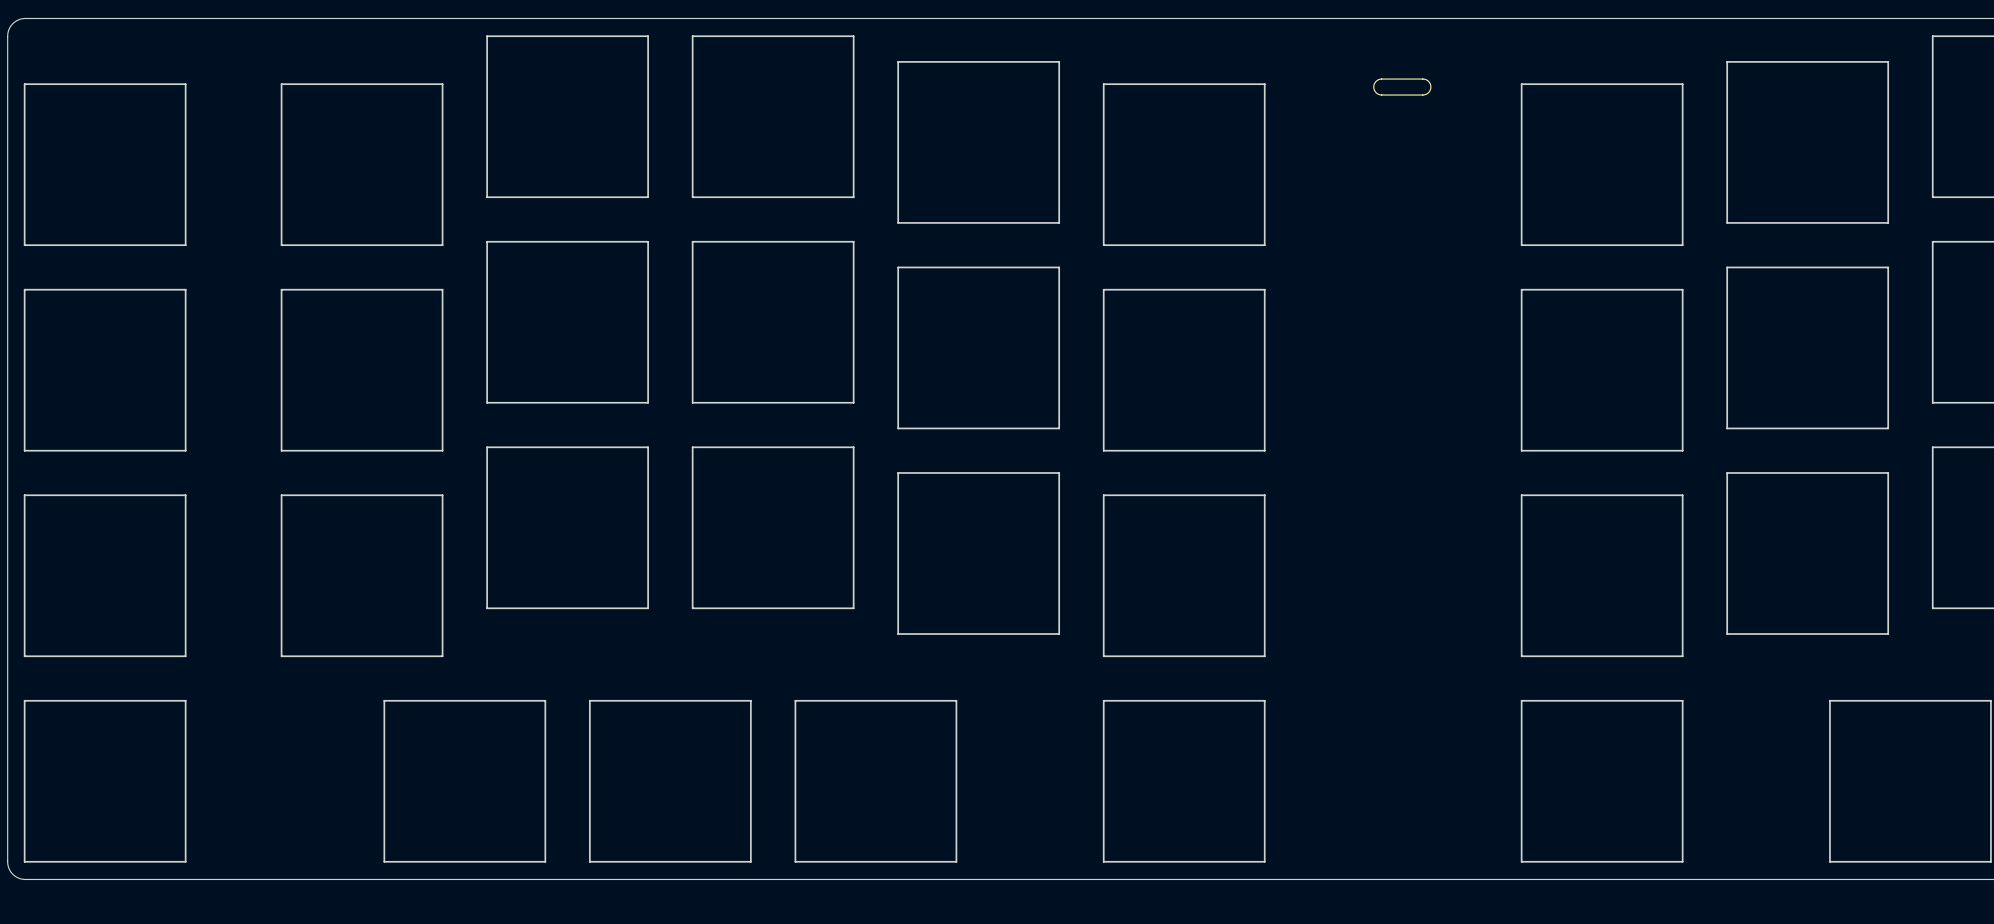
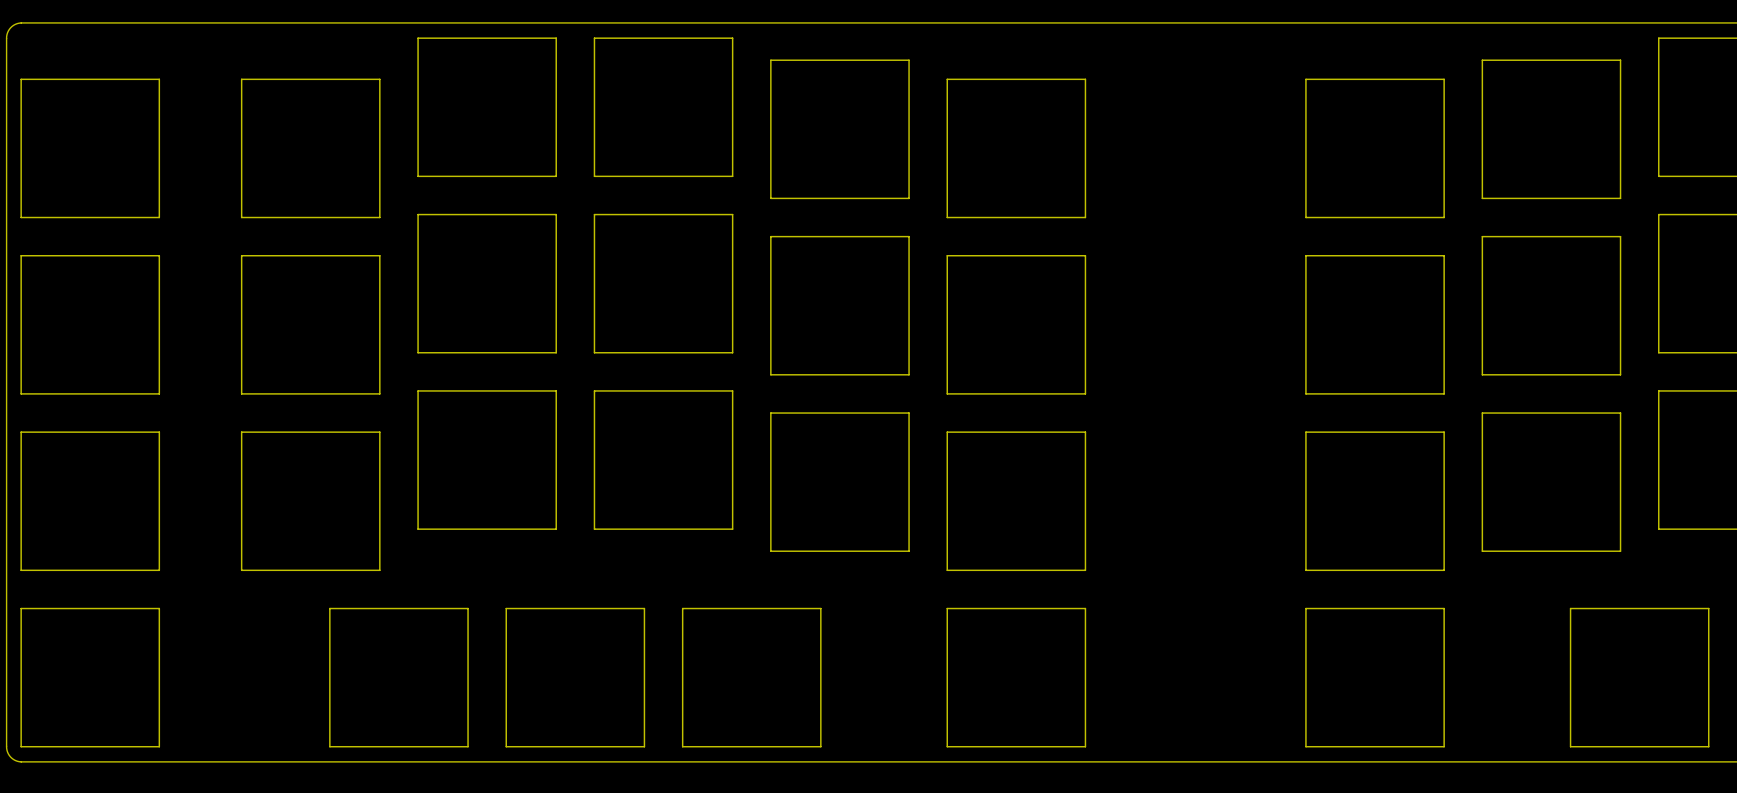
drawing: [1373, 78, 1432, 96] -> none

